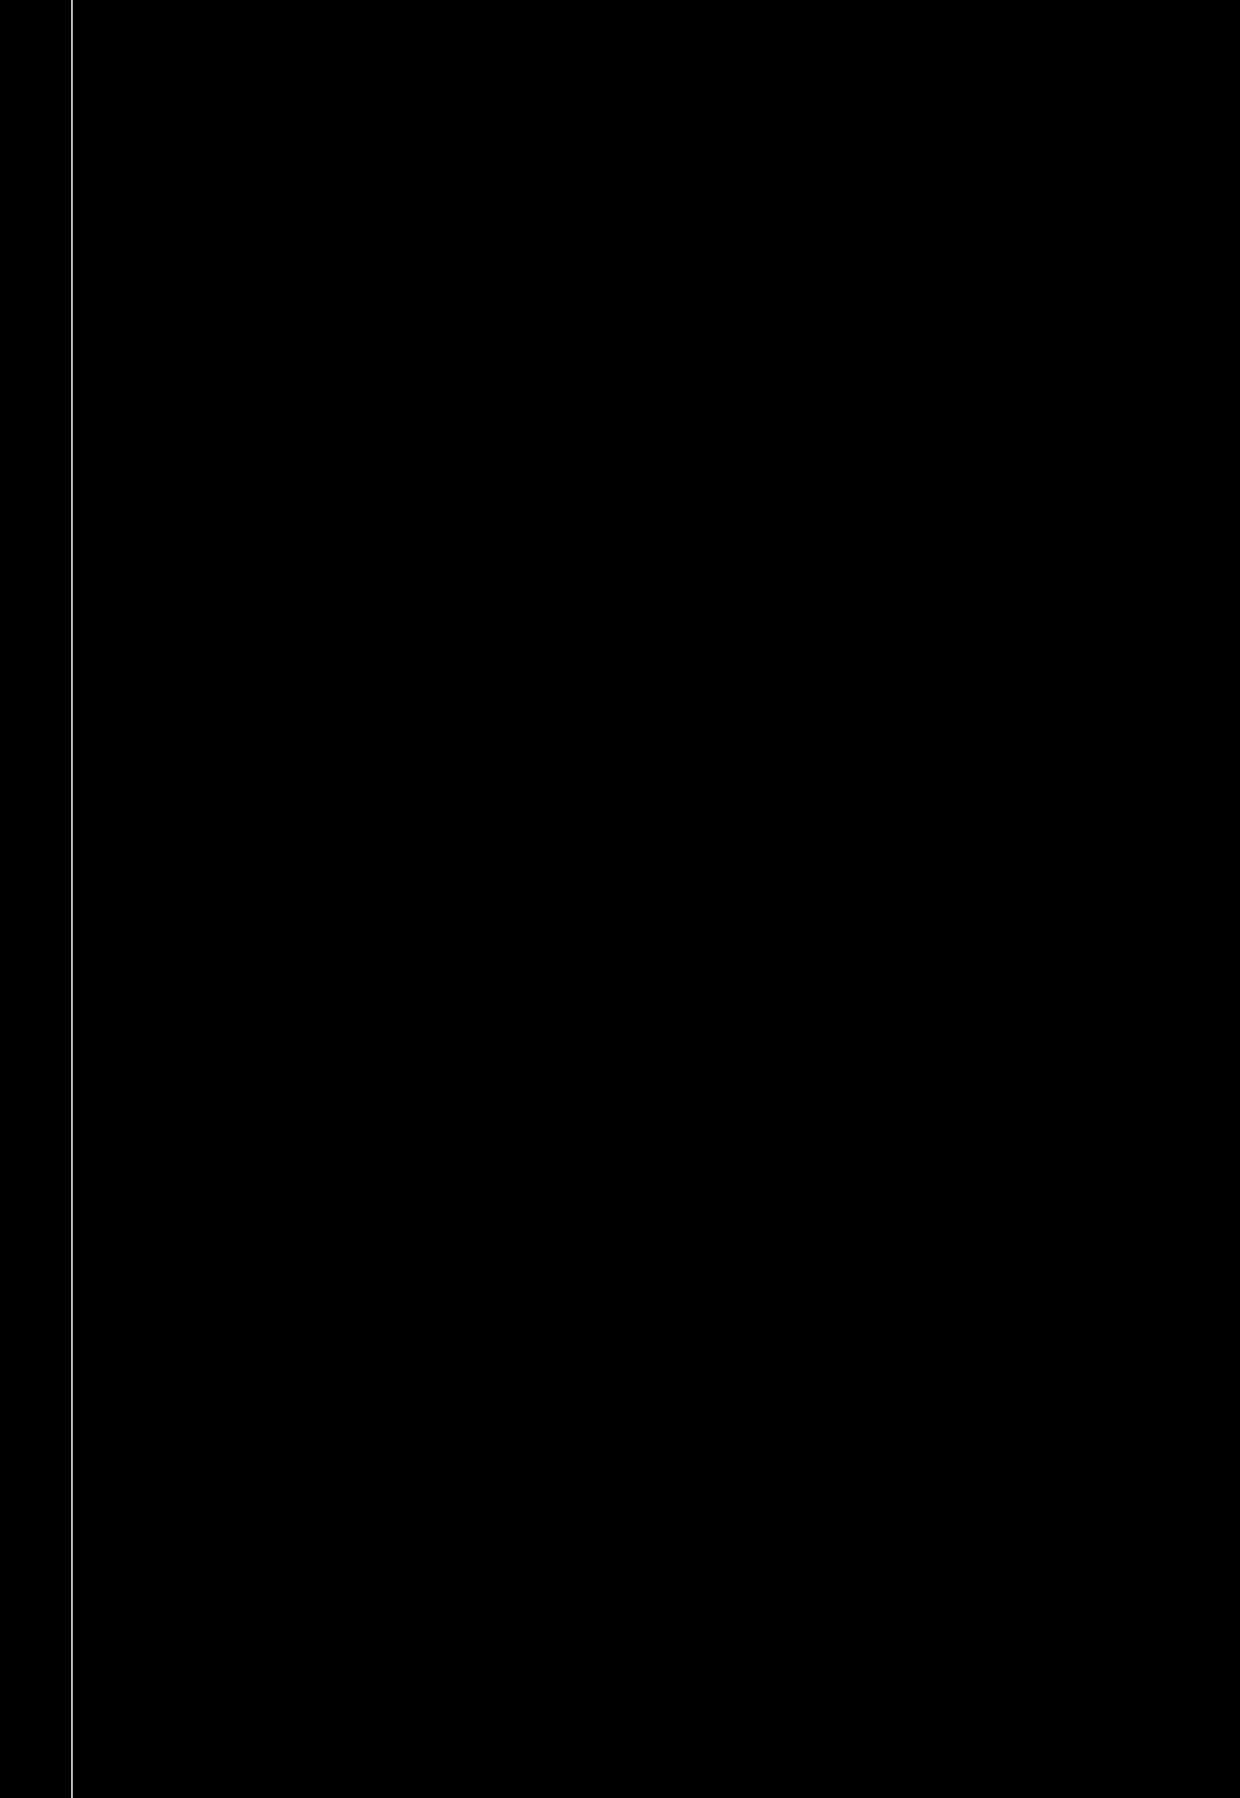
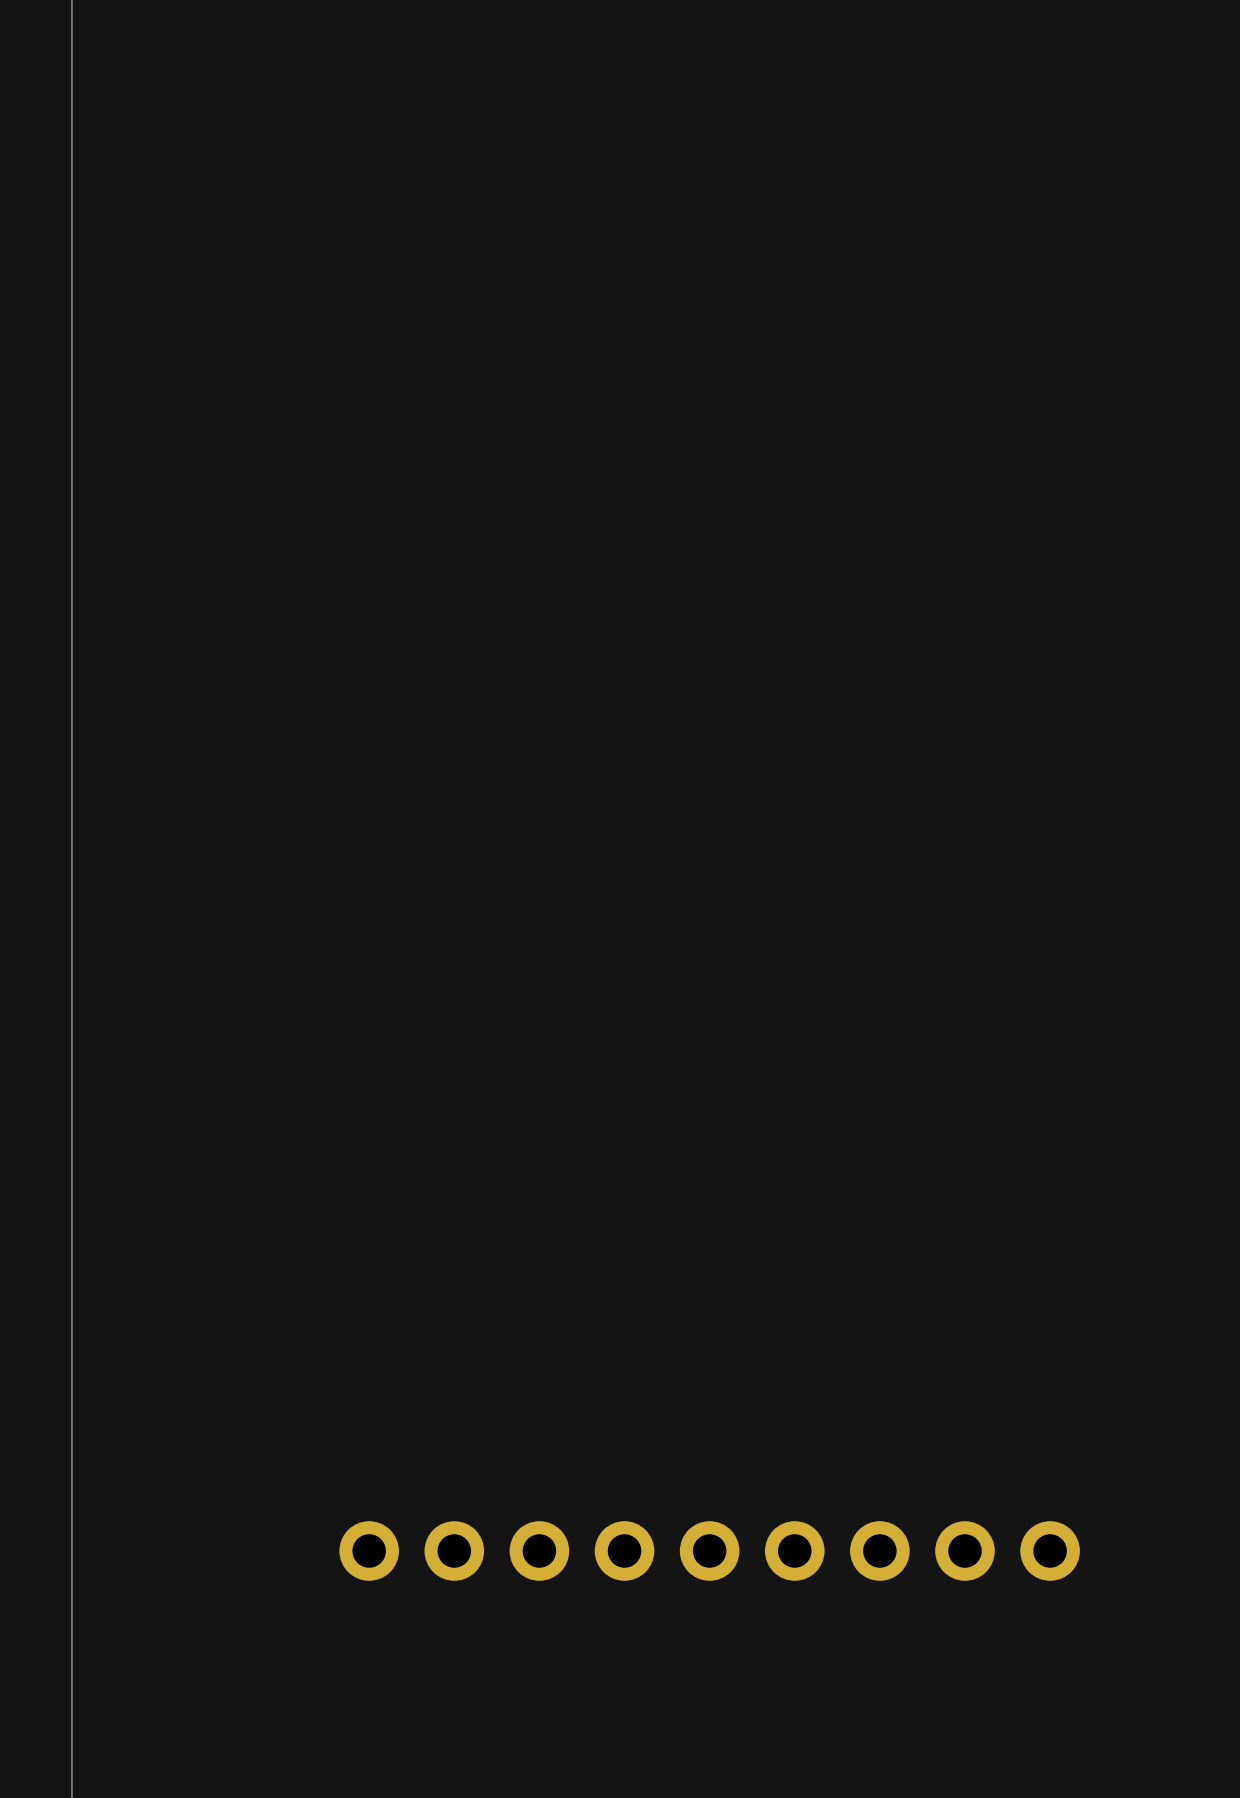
part: none -> (709, 1550)

